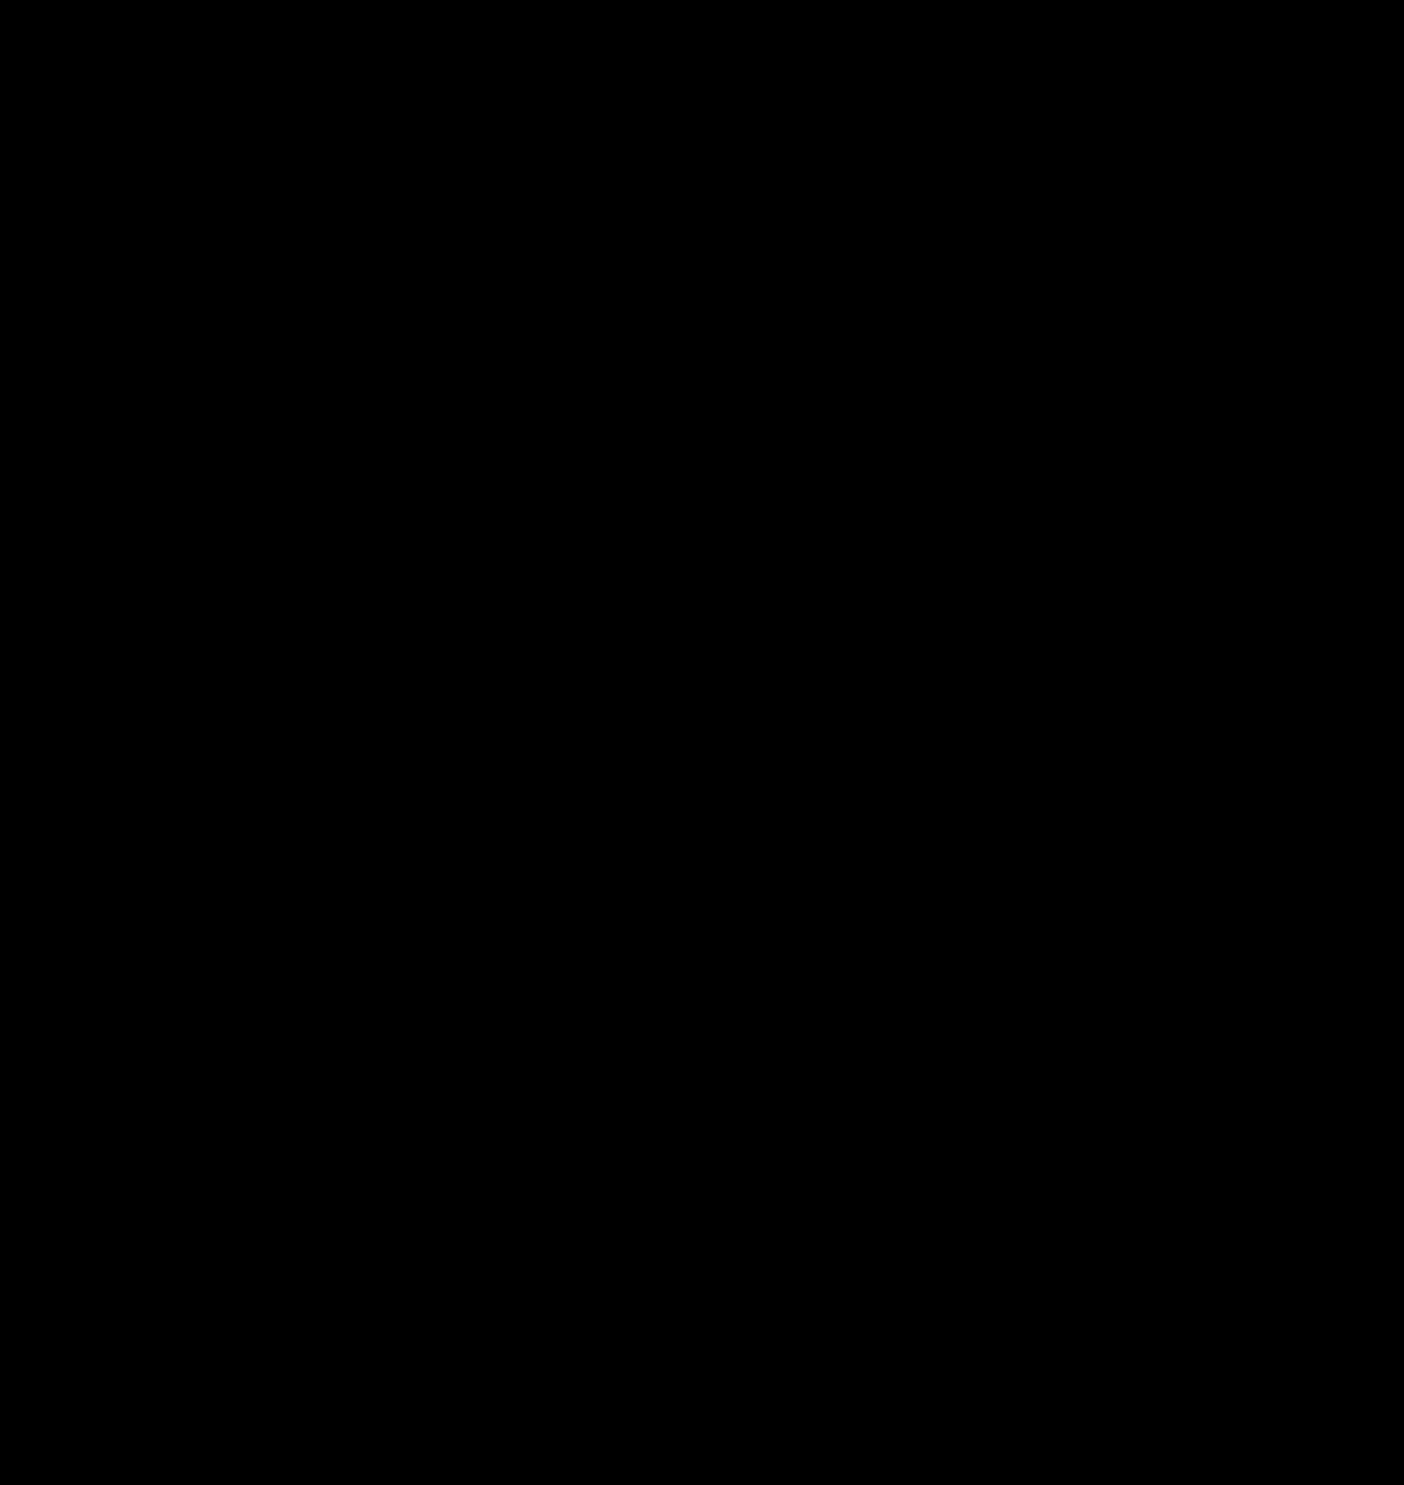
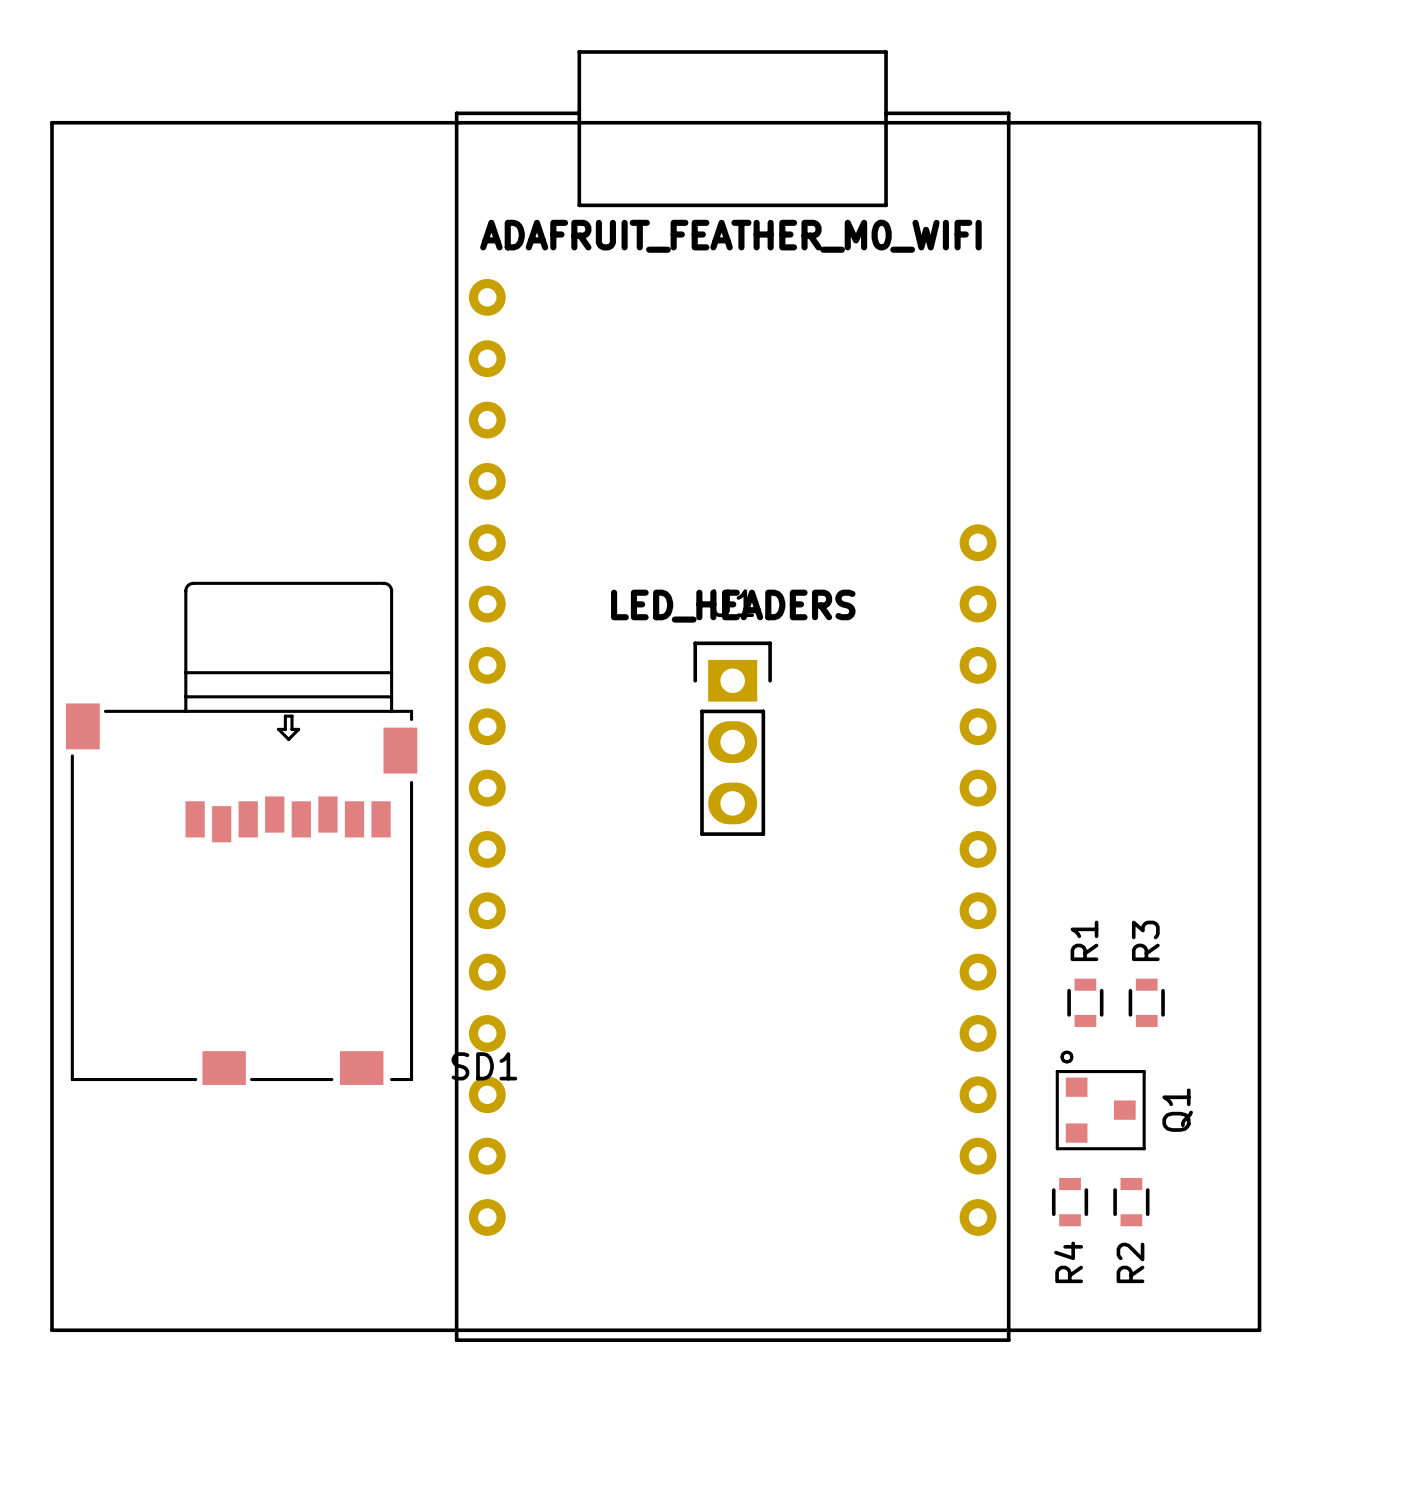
board edge: none -> (51, 122) (51, 1330) (1259, 1330) (1259, 122) (51, 122)
part: none -> ADAFRUIT_FEATHER_M0_WIFI (732, 696)
part: none -> LED_HEADERS (732, 738)
SD1: none -> (241, 833)
R1: none -> (1085, 1002)
R3: none -> (1146, 1002)
Q1: none -> (1100, 1100)
R2: none -> (1070, 1202)
R4: none -> (1131, 1202)

